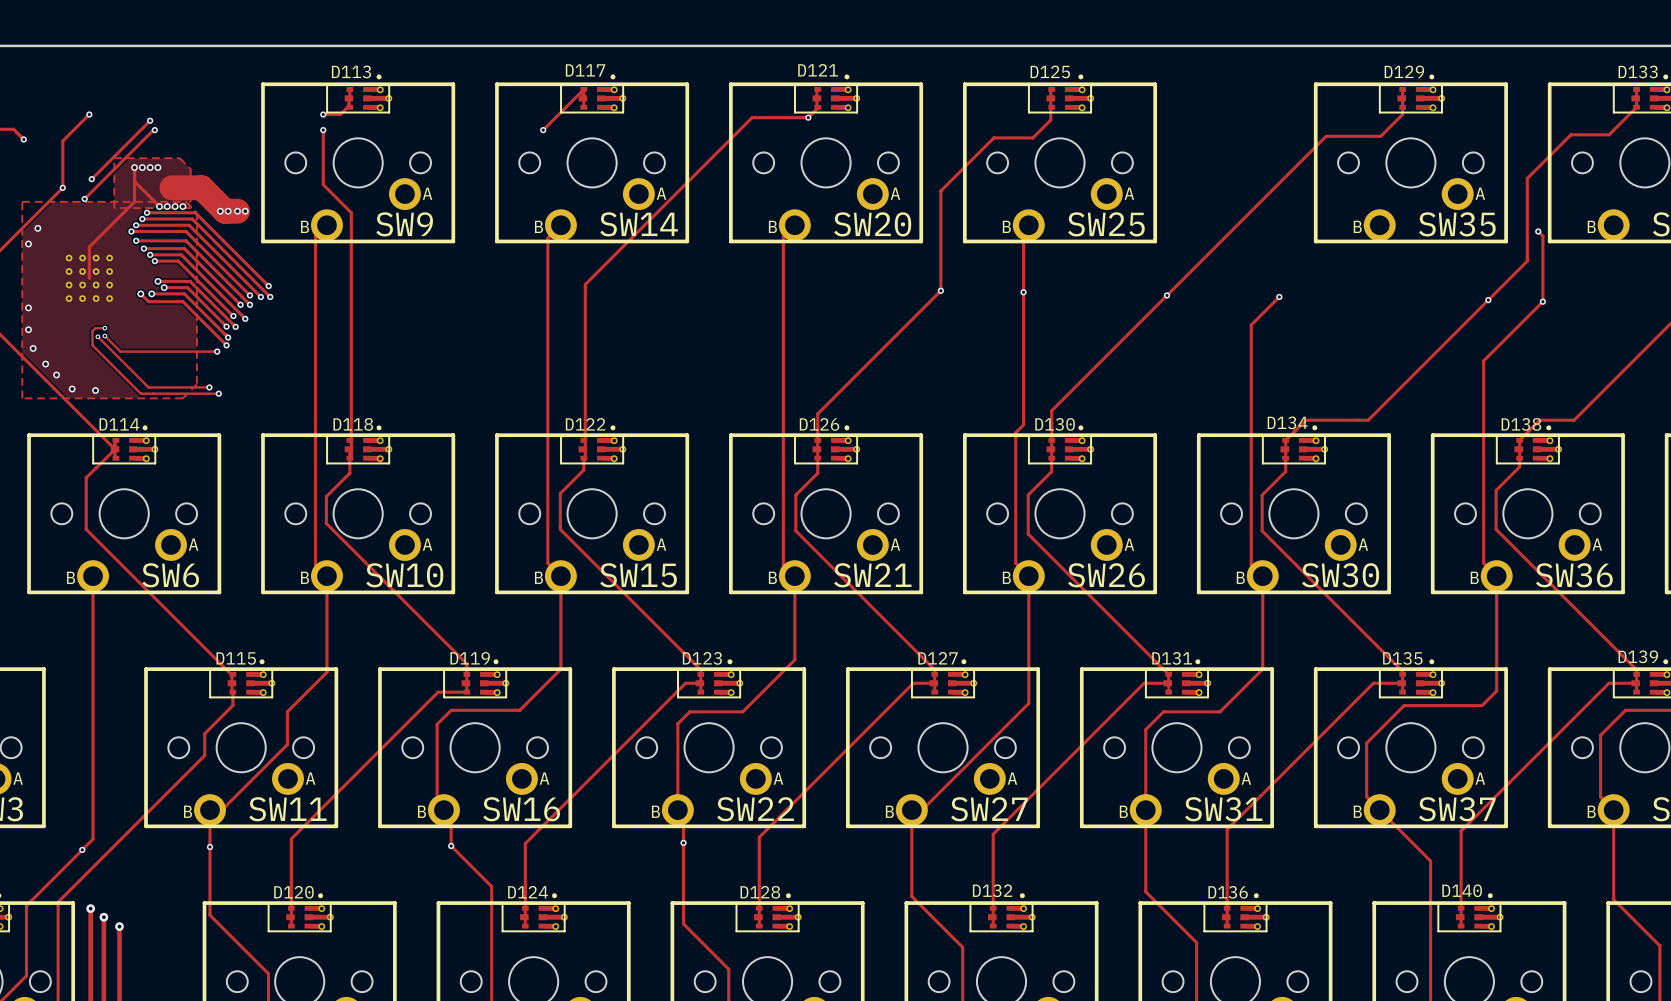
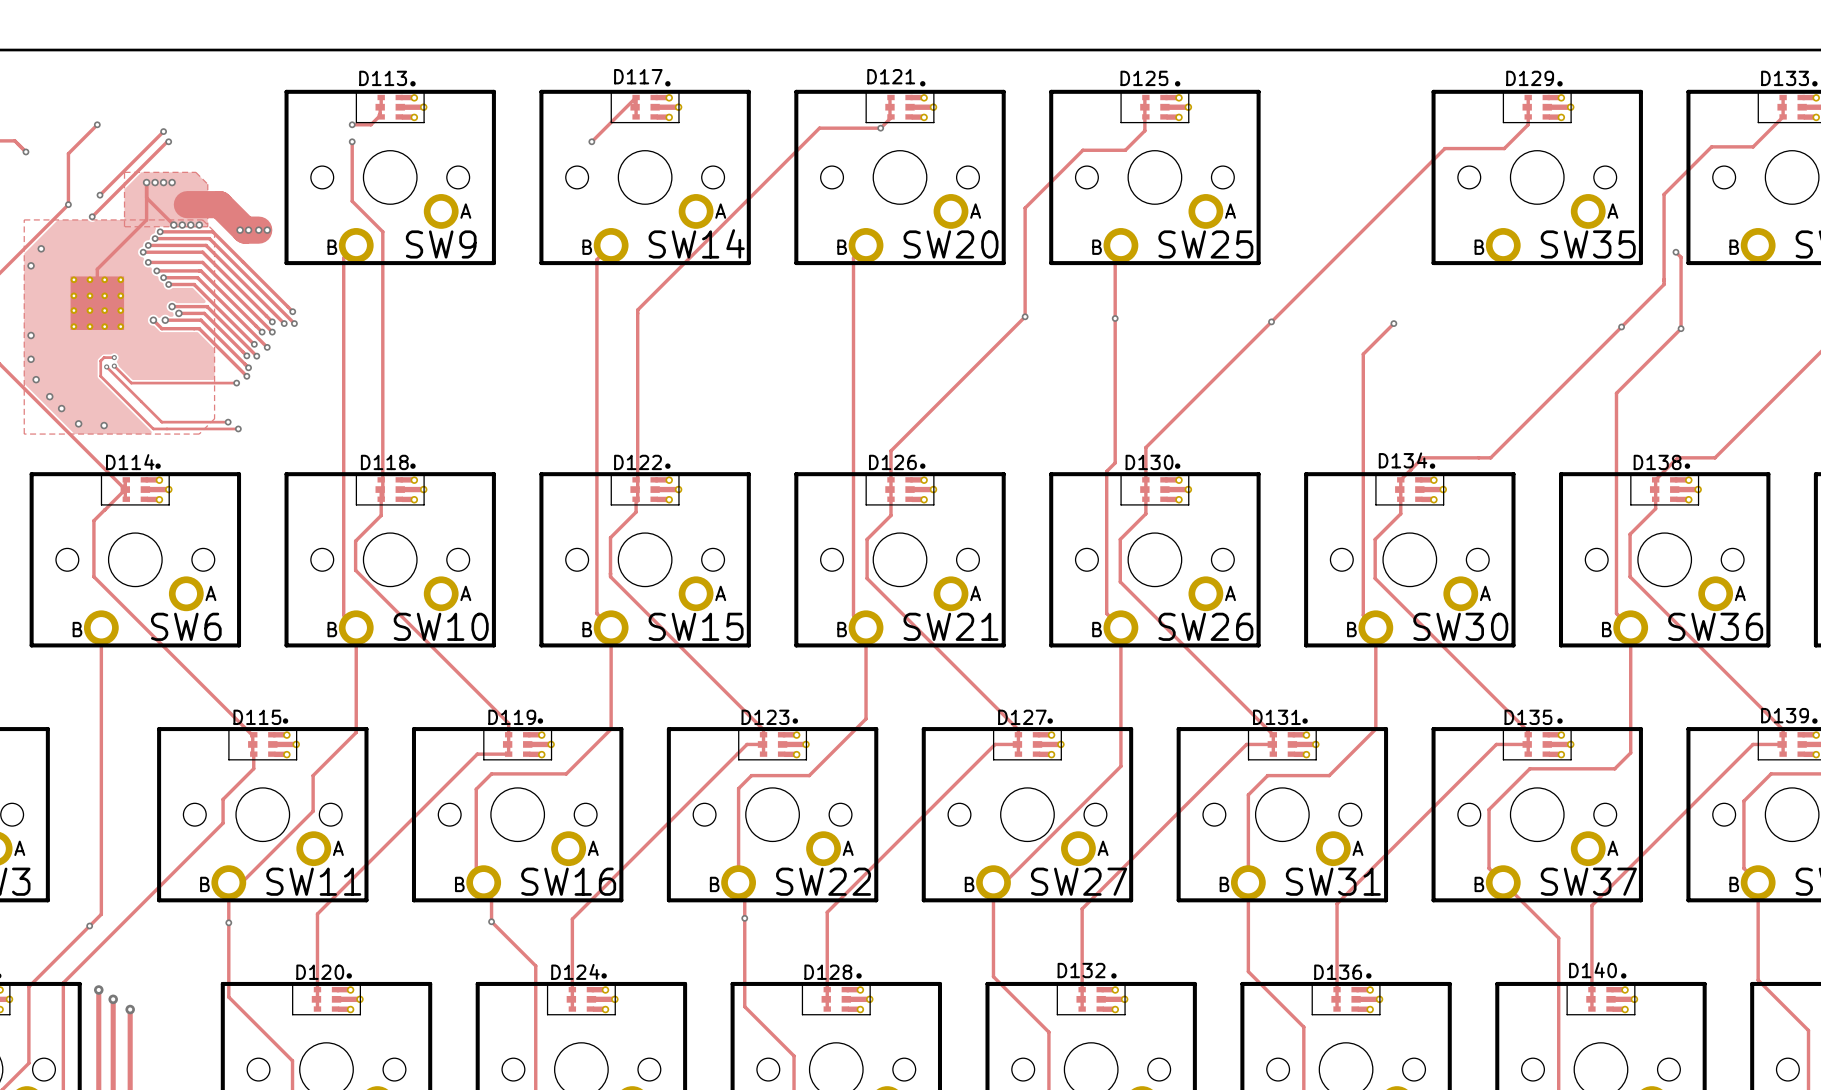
part footprint: [65, 254, 113, 302] -> [70, 276, 125, 330]

